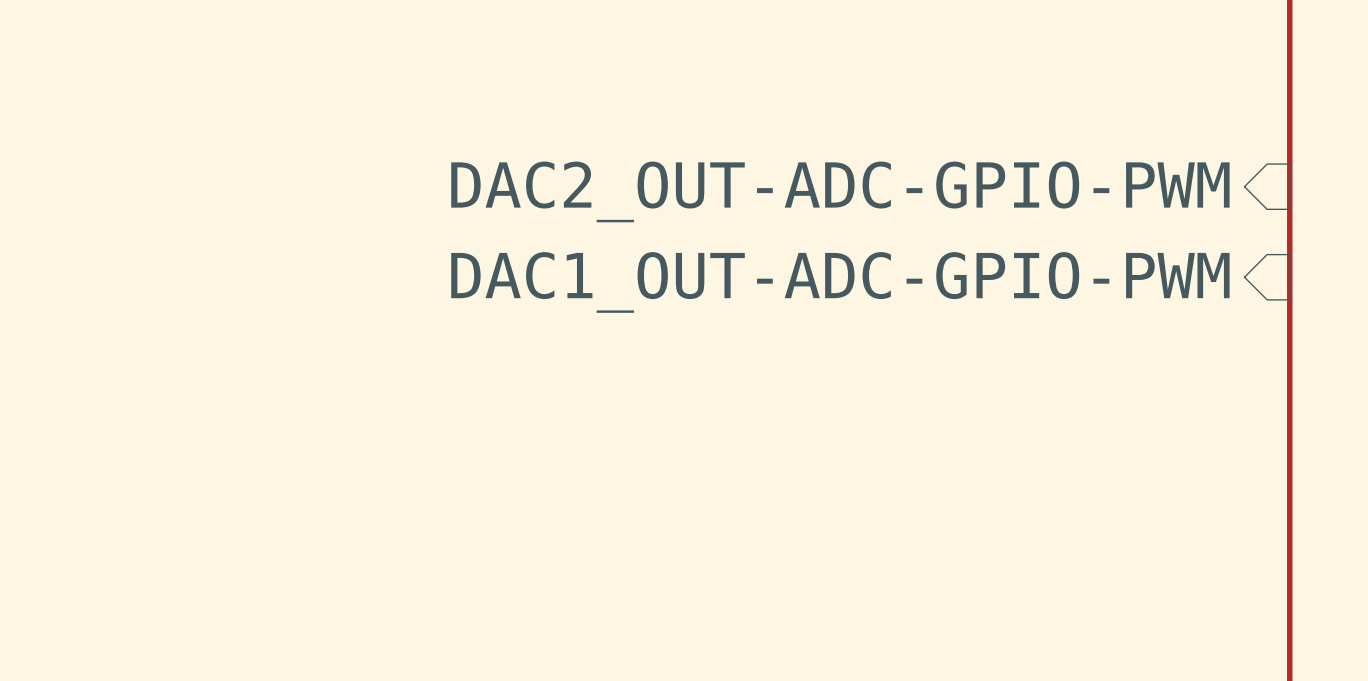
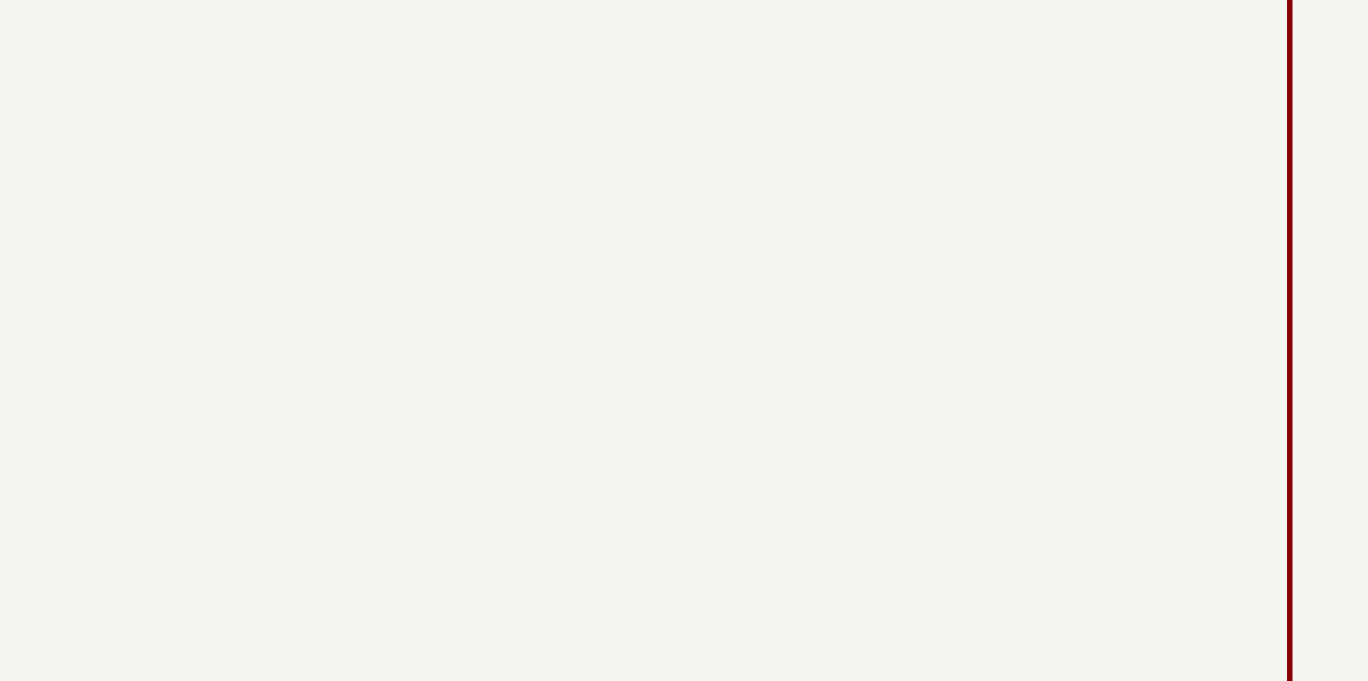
sheet pin: DAC2_OUT-ADC-GPIO-PWM (840, 191) -> none
sheet pin: DAC1_OUT-ADC-GPIO-PWM (840, 282) -> none

